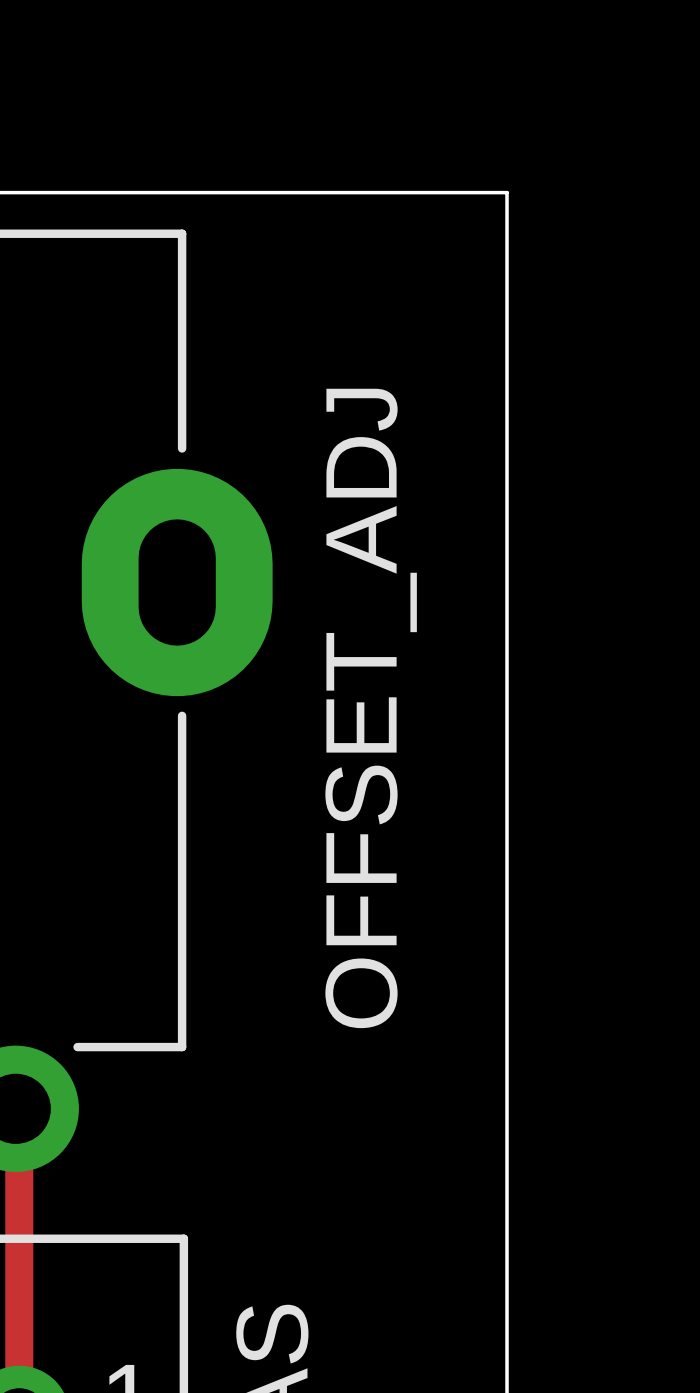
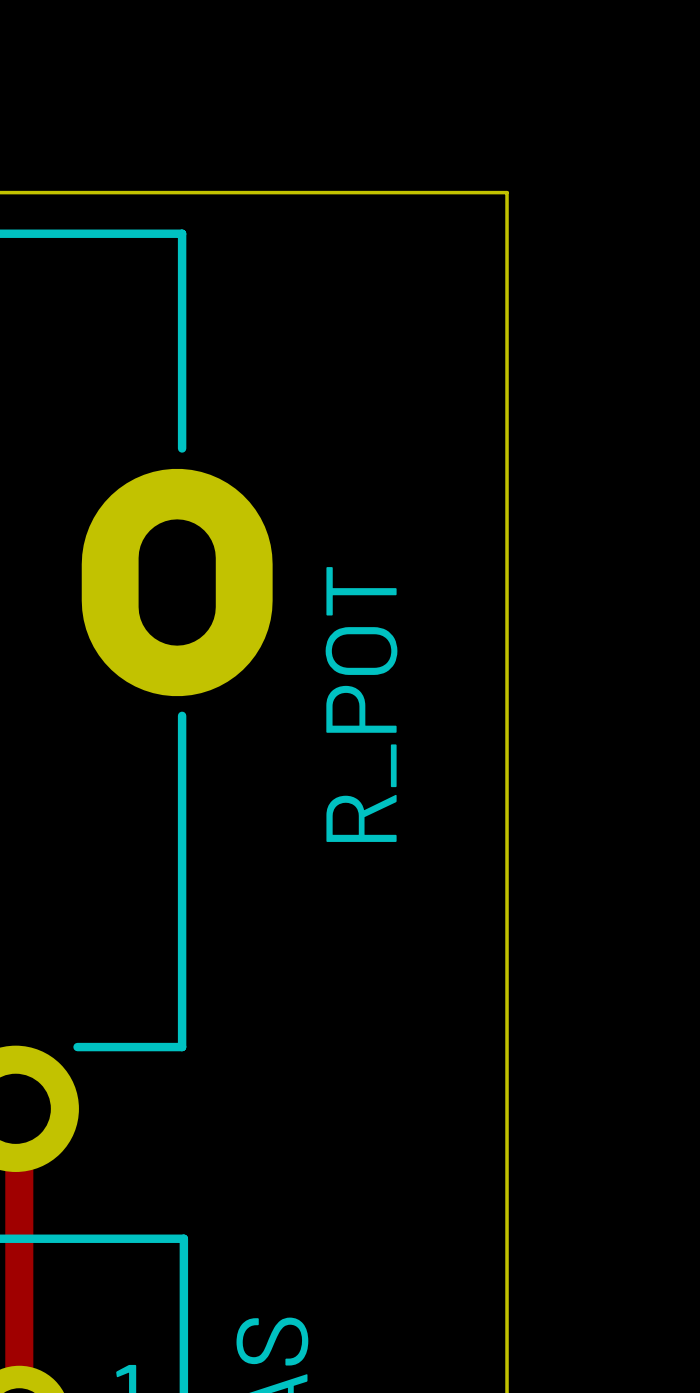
part value: OFFSET_ADJ (371, 708) -> R_POT (361, 704)

